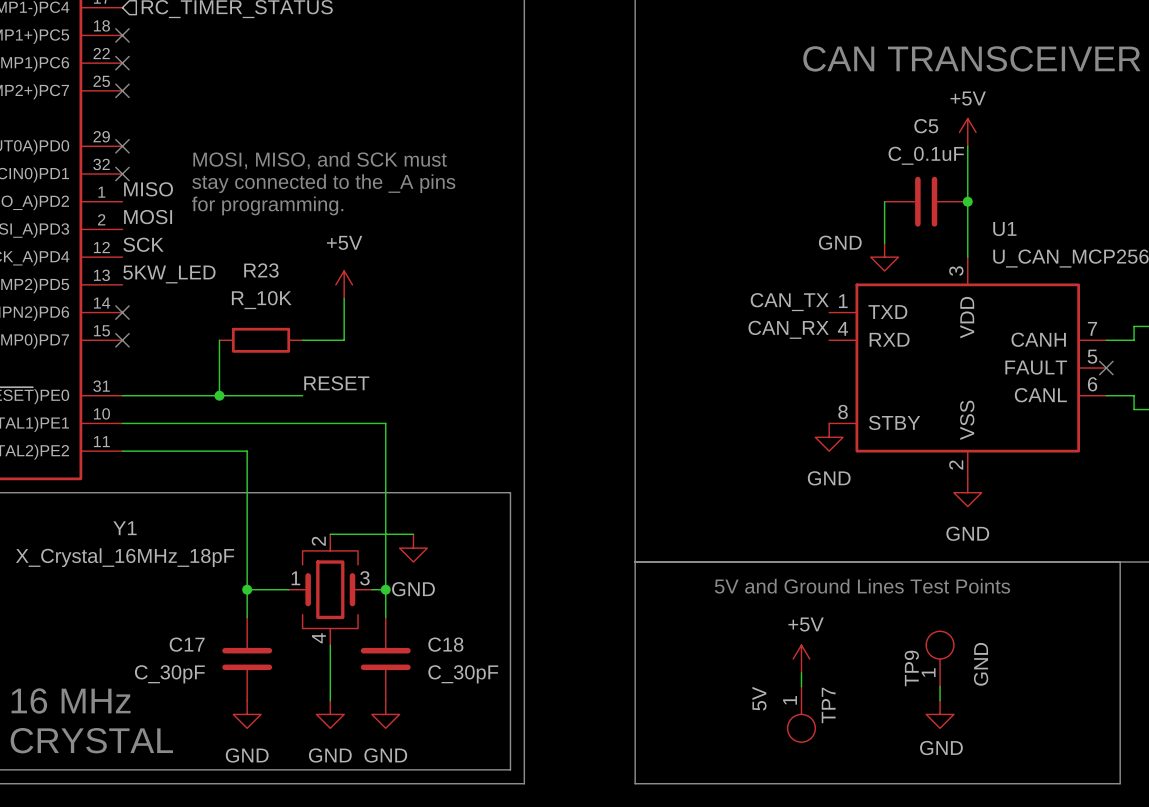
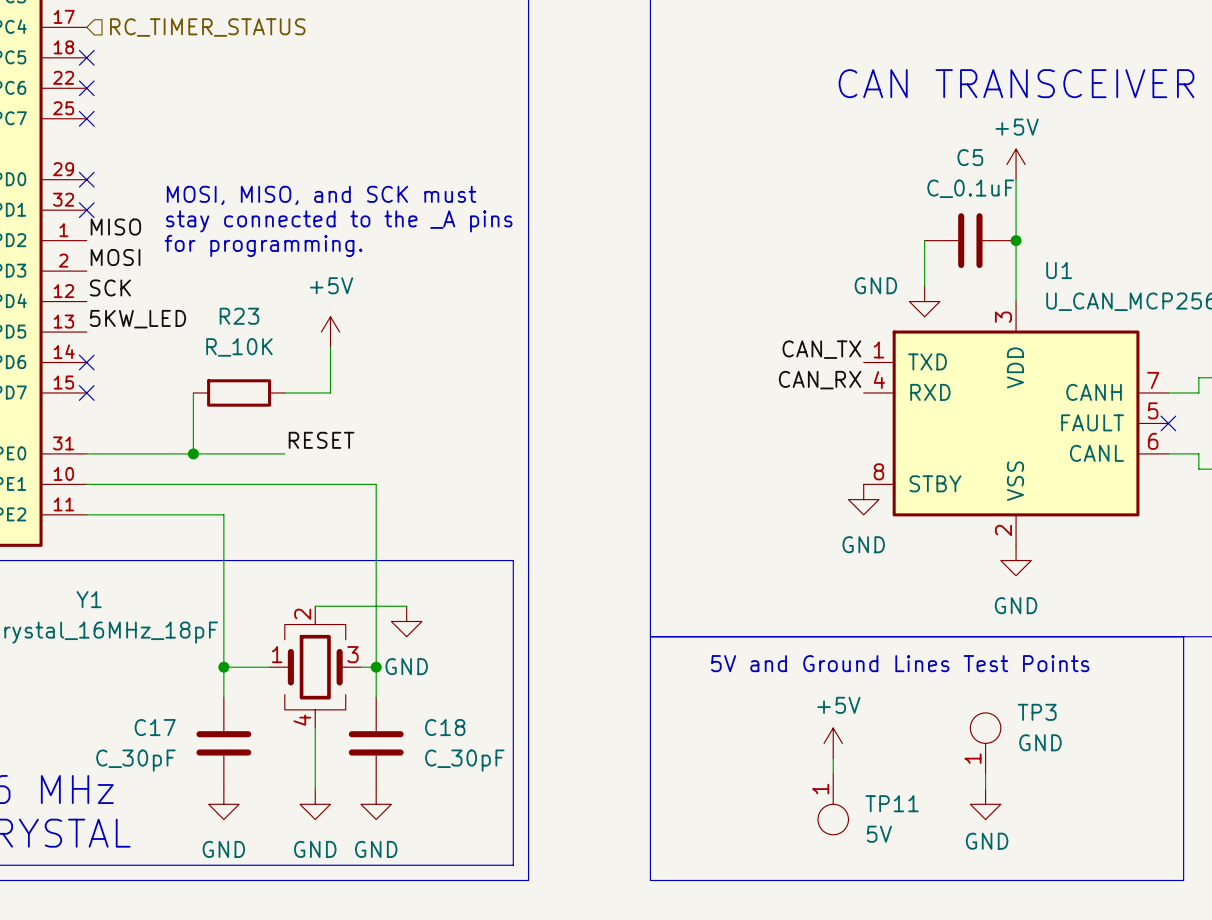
TP9 value rotation: 0° (981, 664) -> 90° clockwise (1040, 742)
TP9 name: TP9 (911, 668) -> TP3 (1037, 712)
TP7 value rotation: 0° (759, 698) -> 90° clockwise (879, 834)
TP7 value position: 5V (759, 698) -> 5V (879, 834)
TP7 name: TP7 (828, 705) -> TP11 (892, 803)

